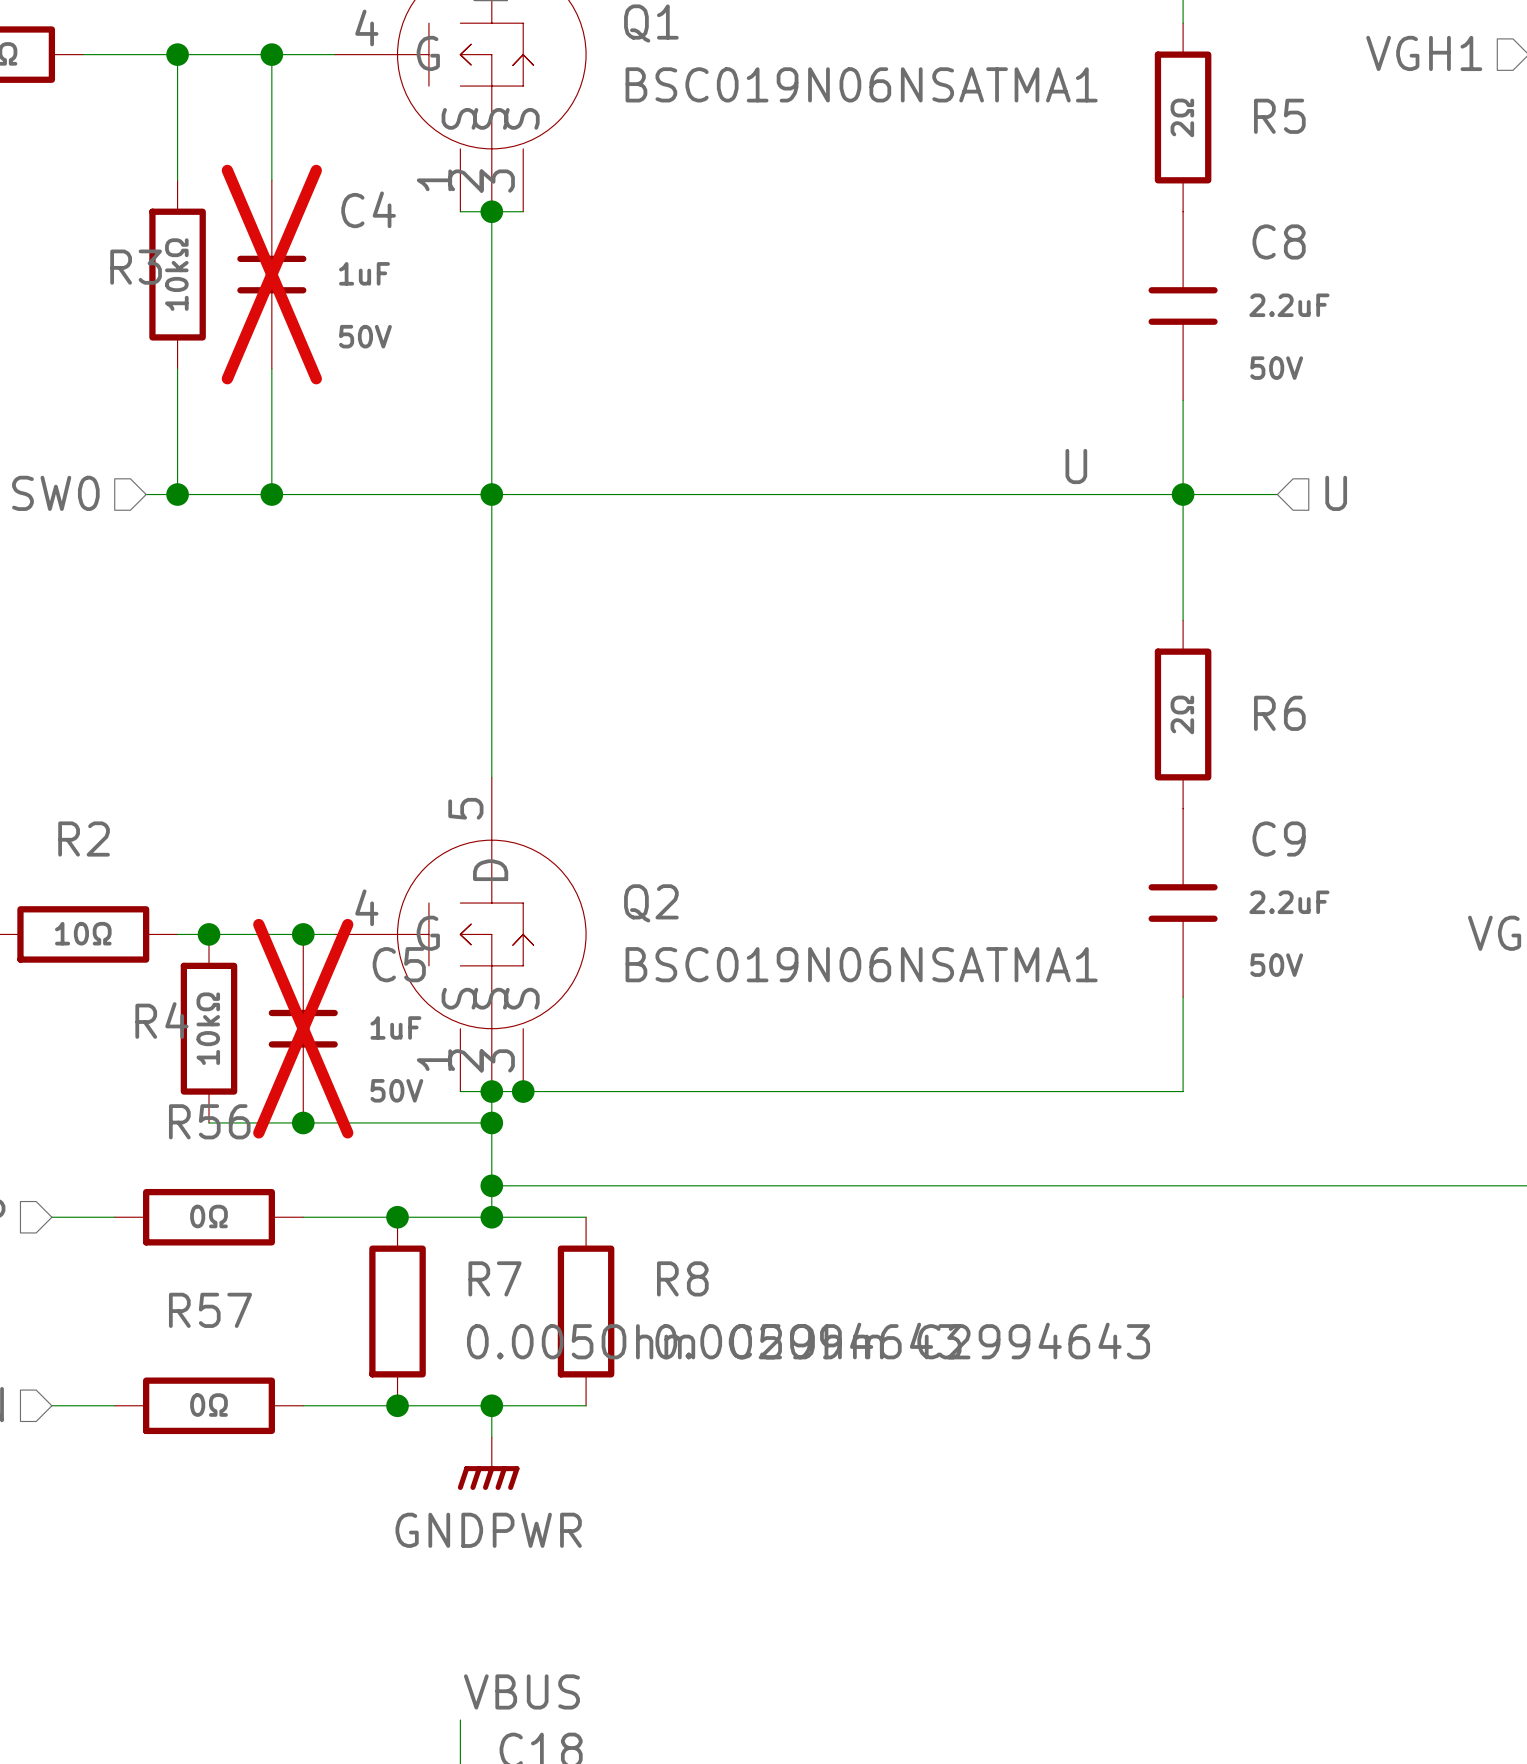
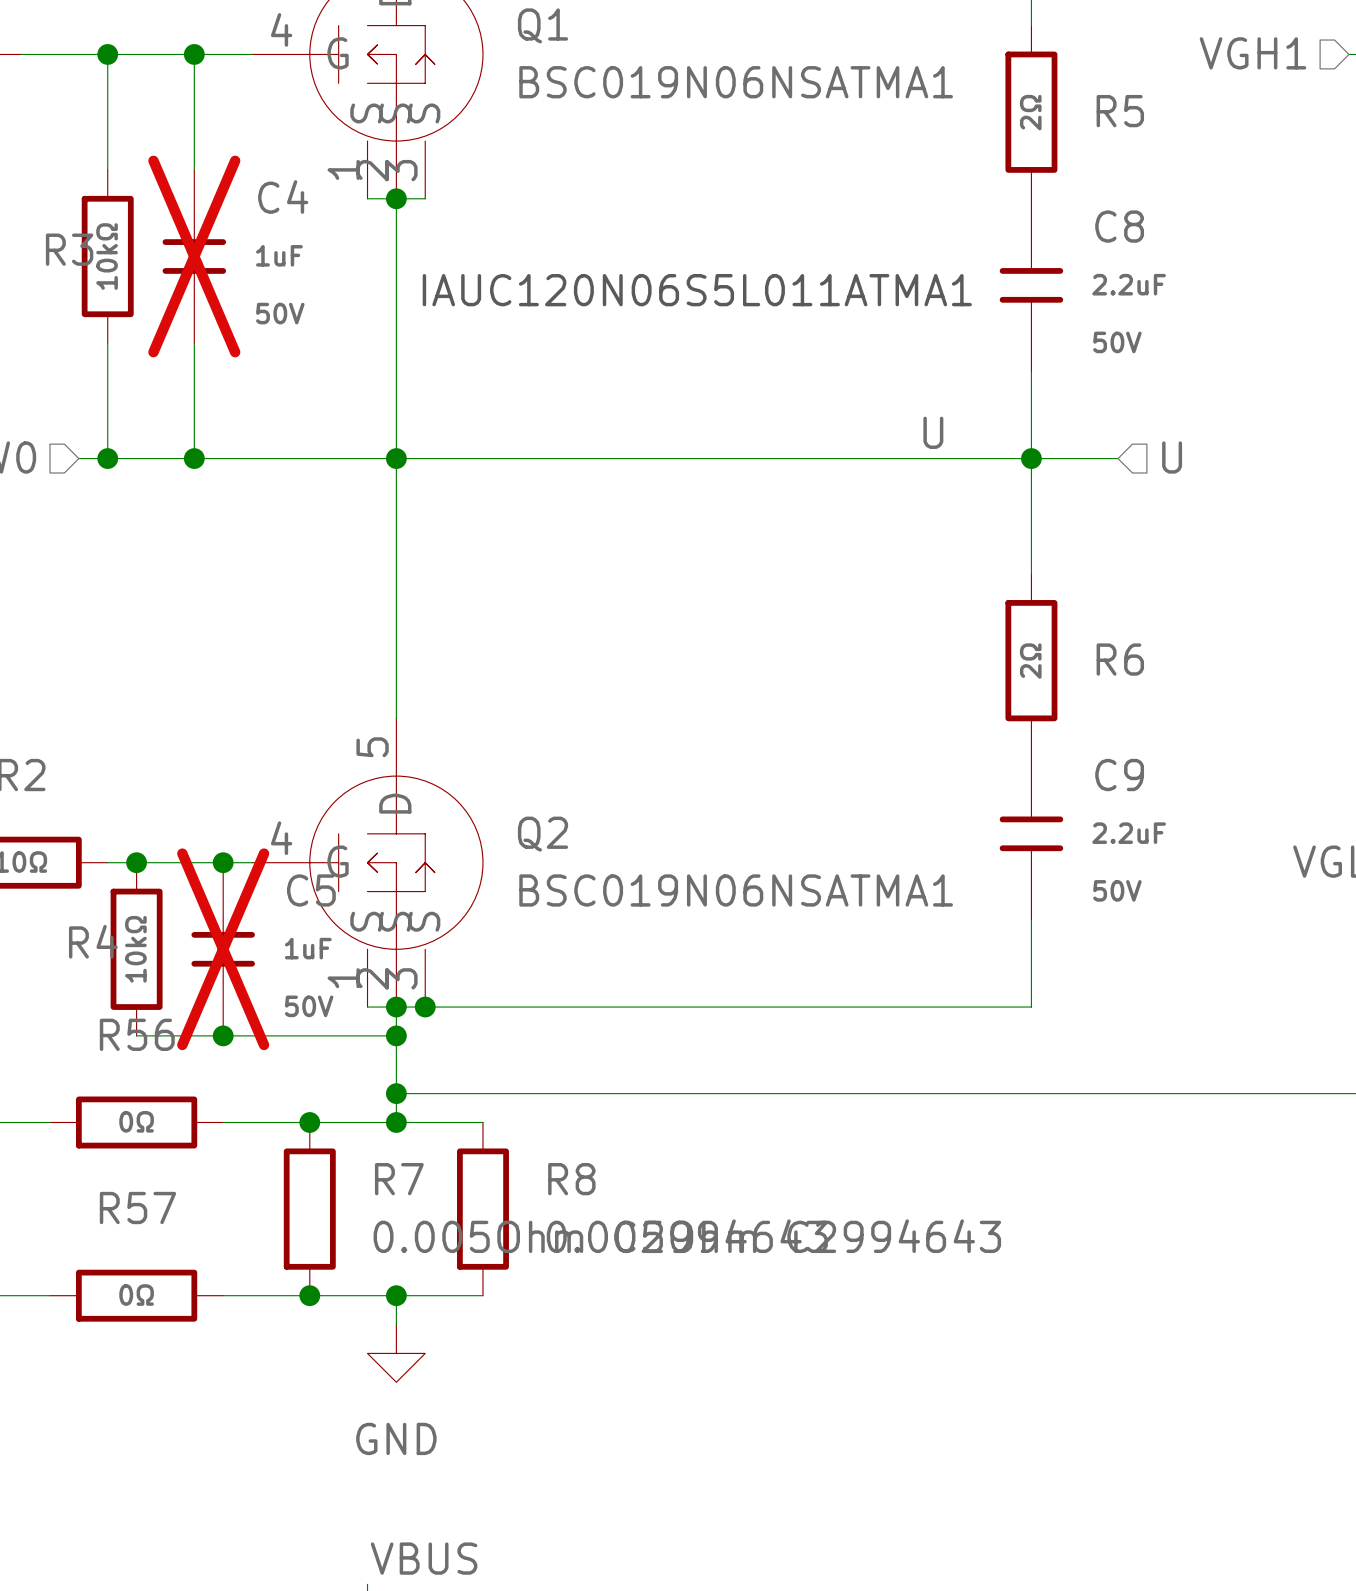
text: none -> IAUC120N06S5L011ATMA1 (697, 290)
power symbol: GNDPWR (488, 1463) -> GND (396, 1353)

